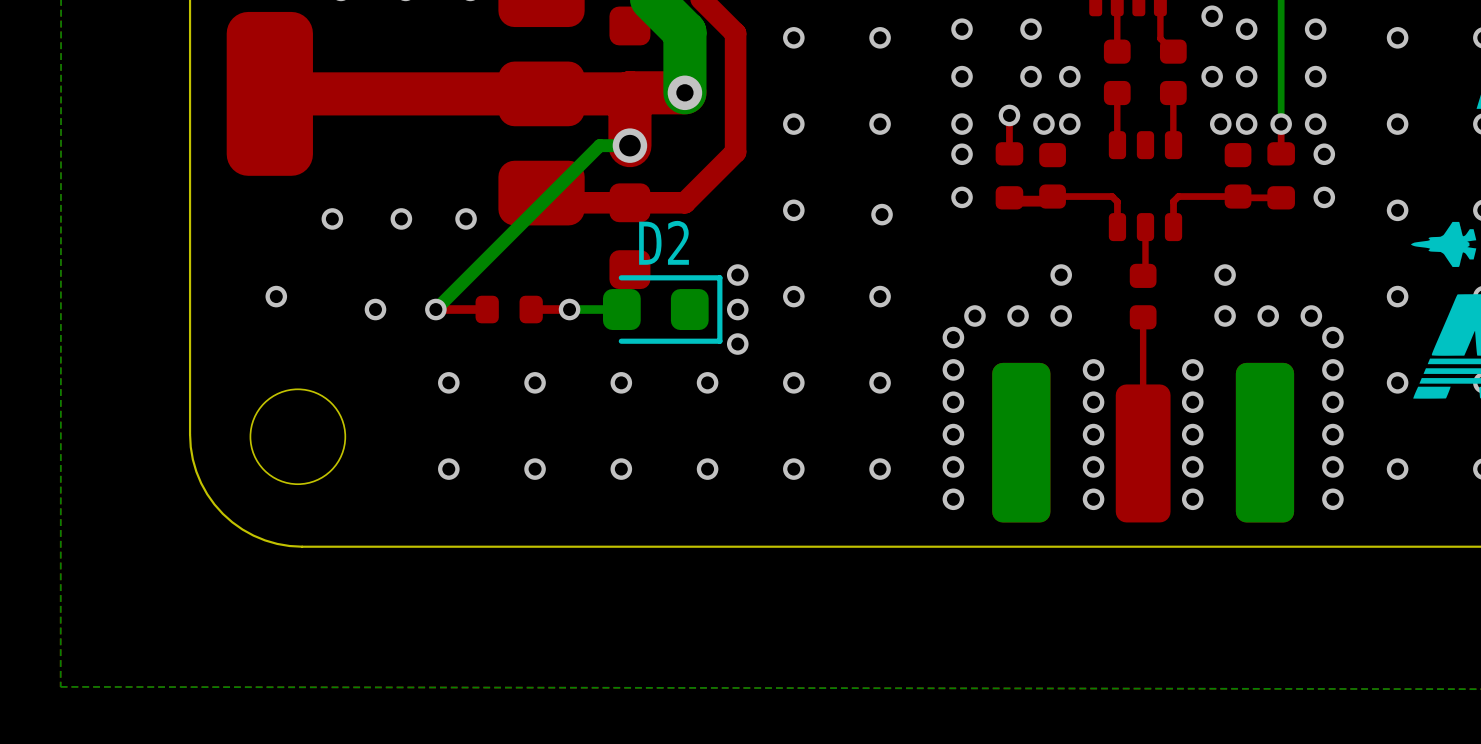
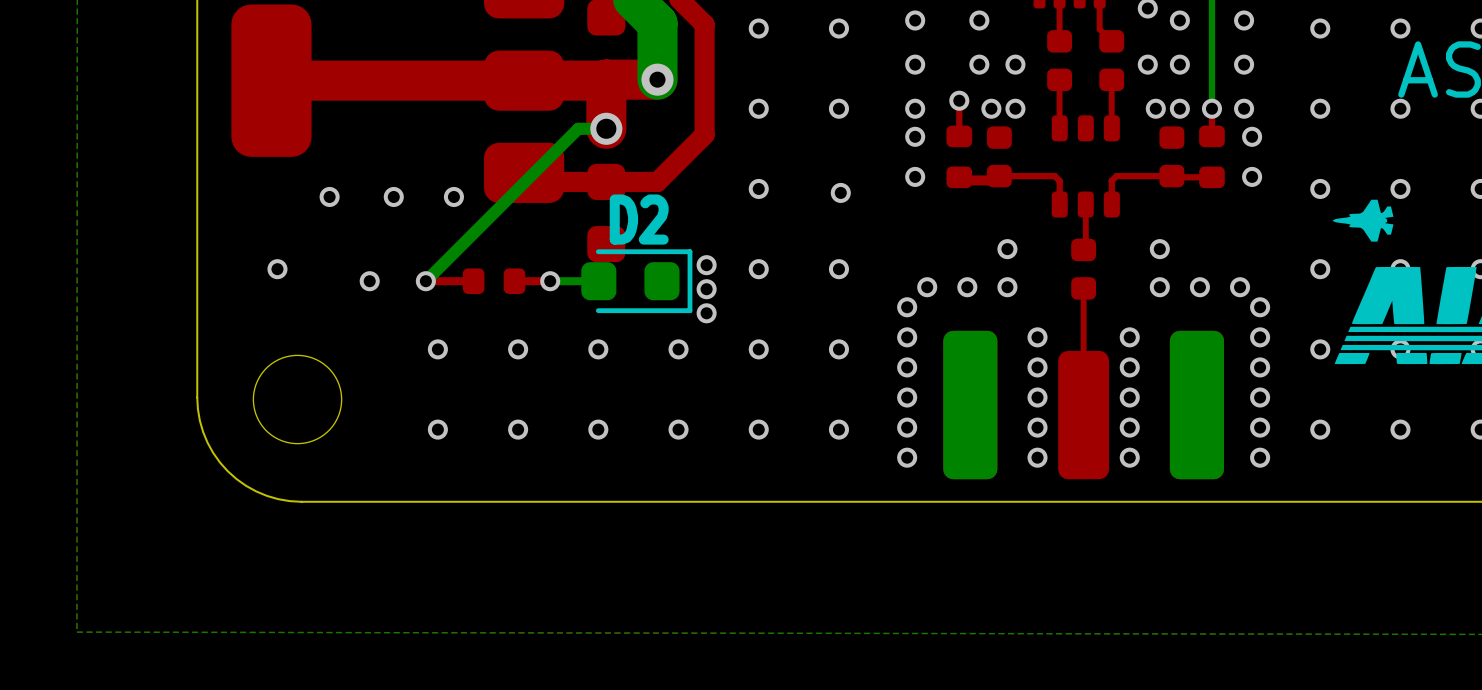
via: (737, 275) -> none
via: none -> (706, 265)
via: (737, 309) -> none
via: none -> (706, 289)

